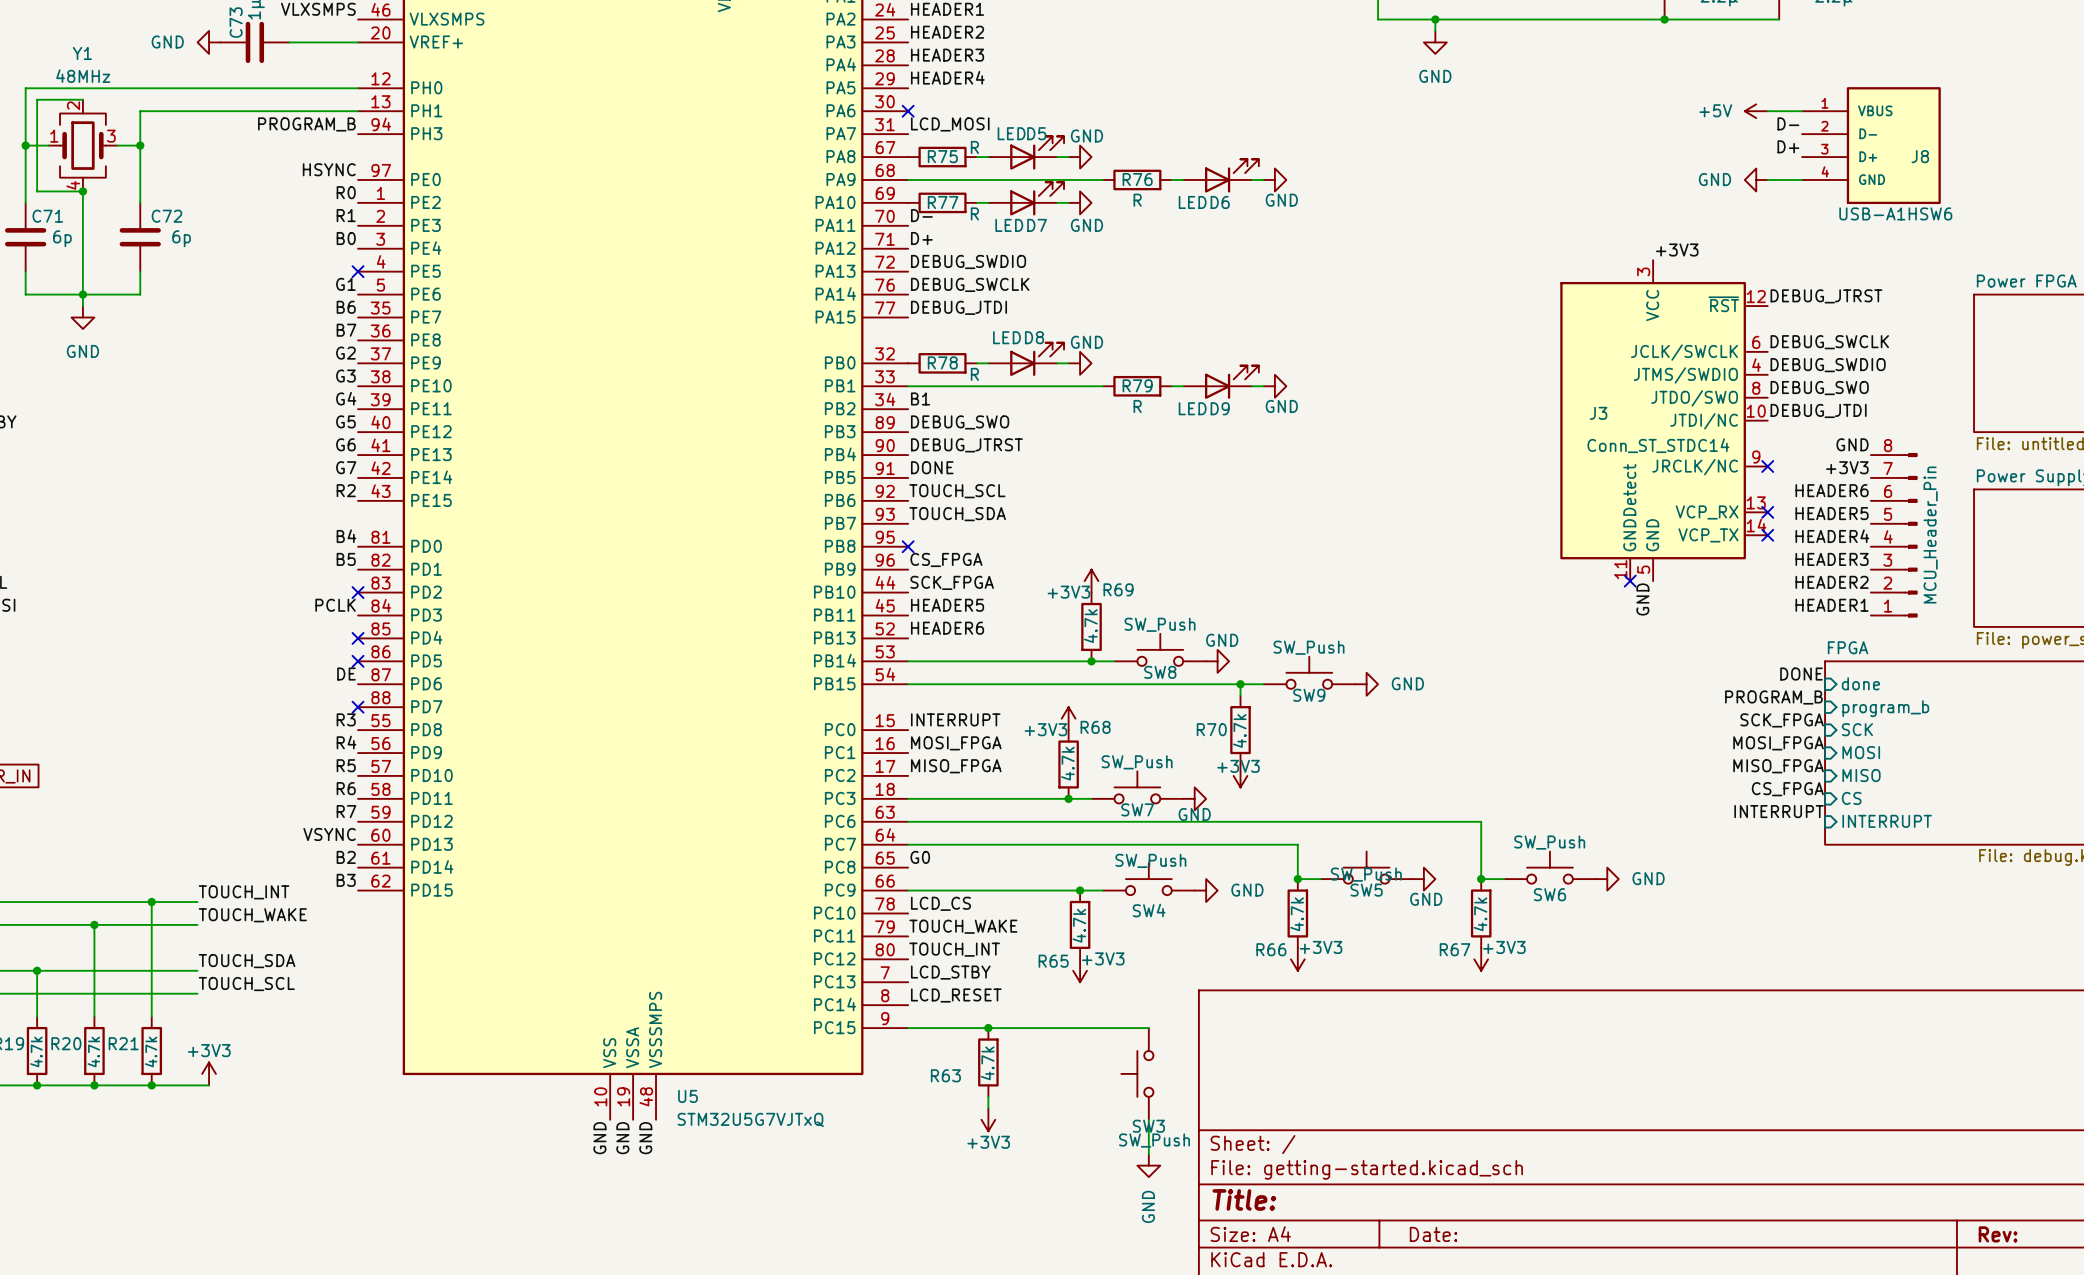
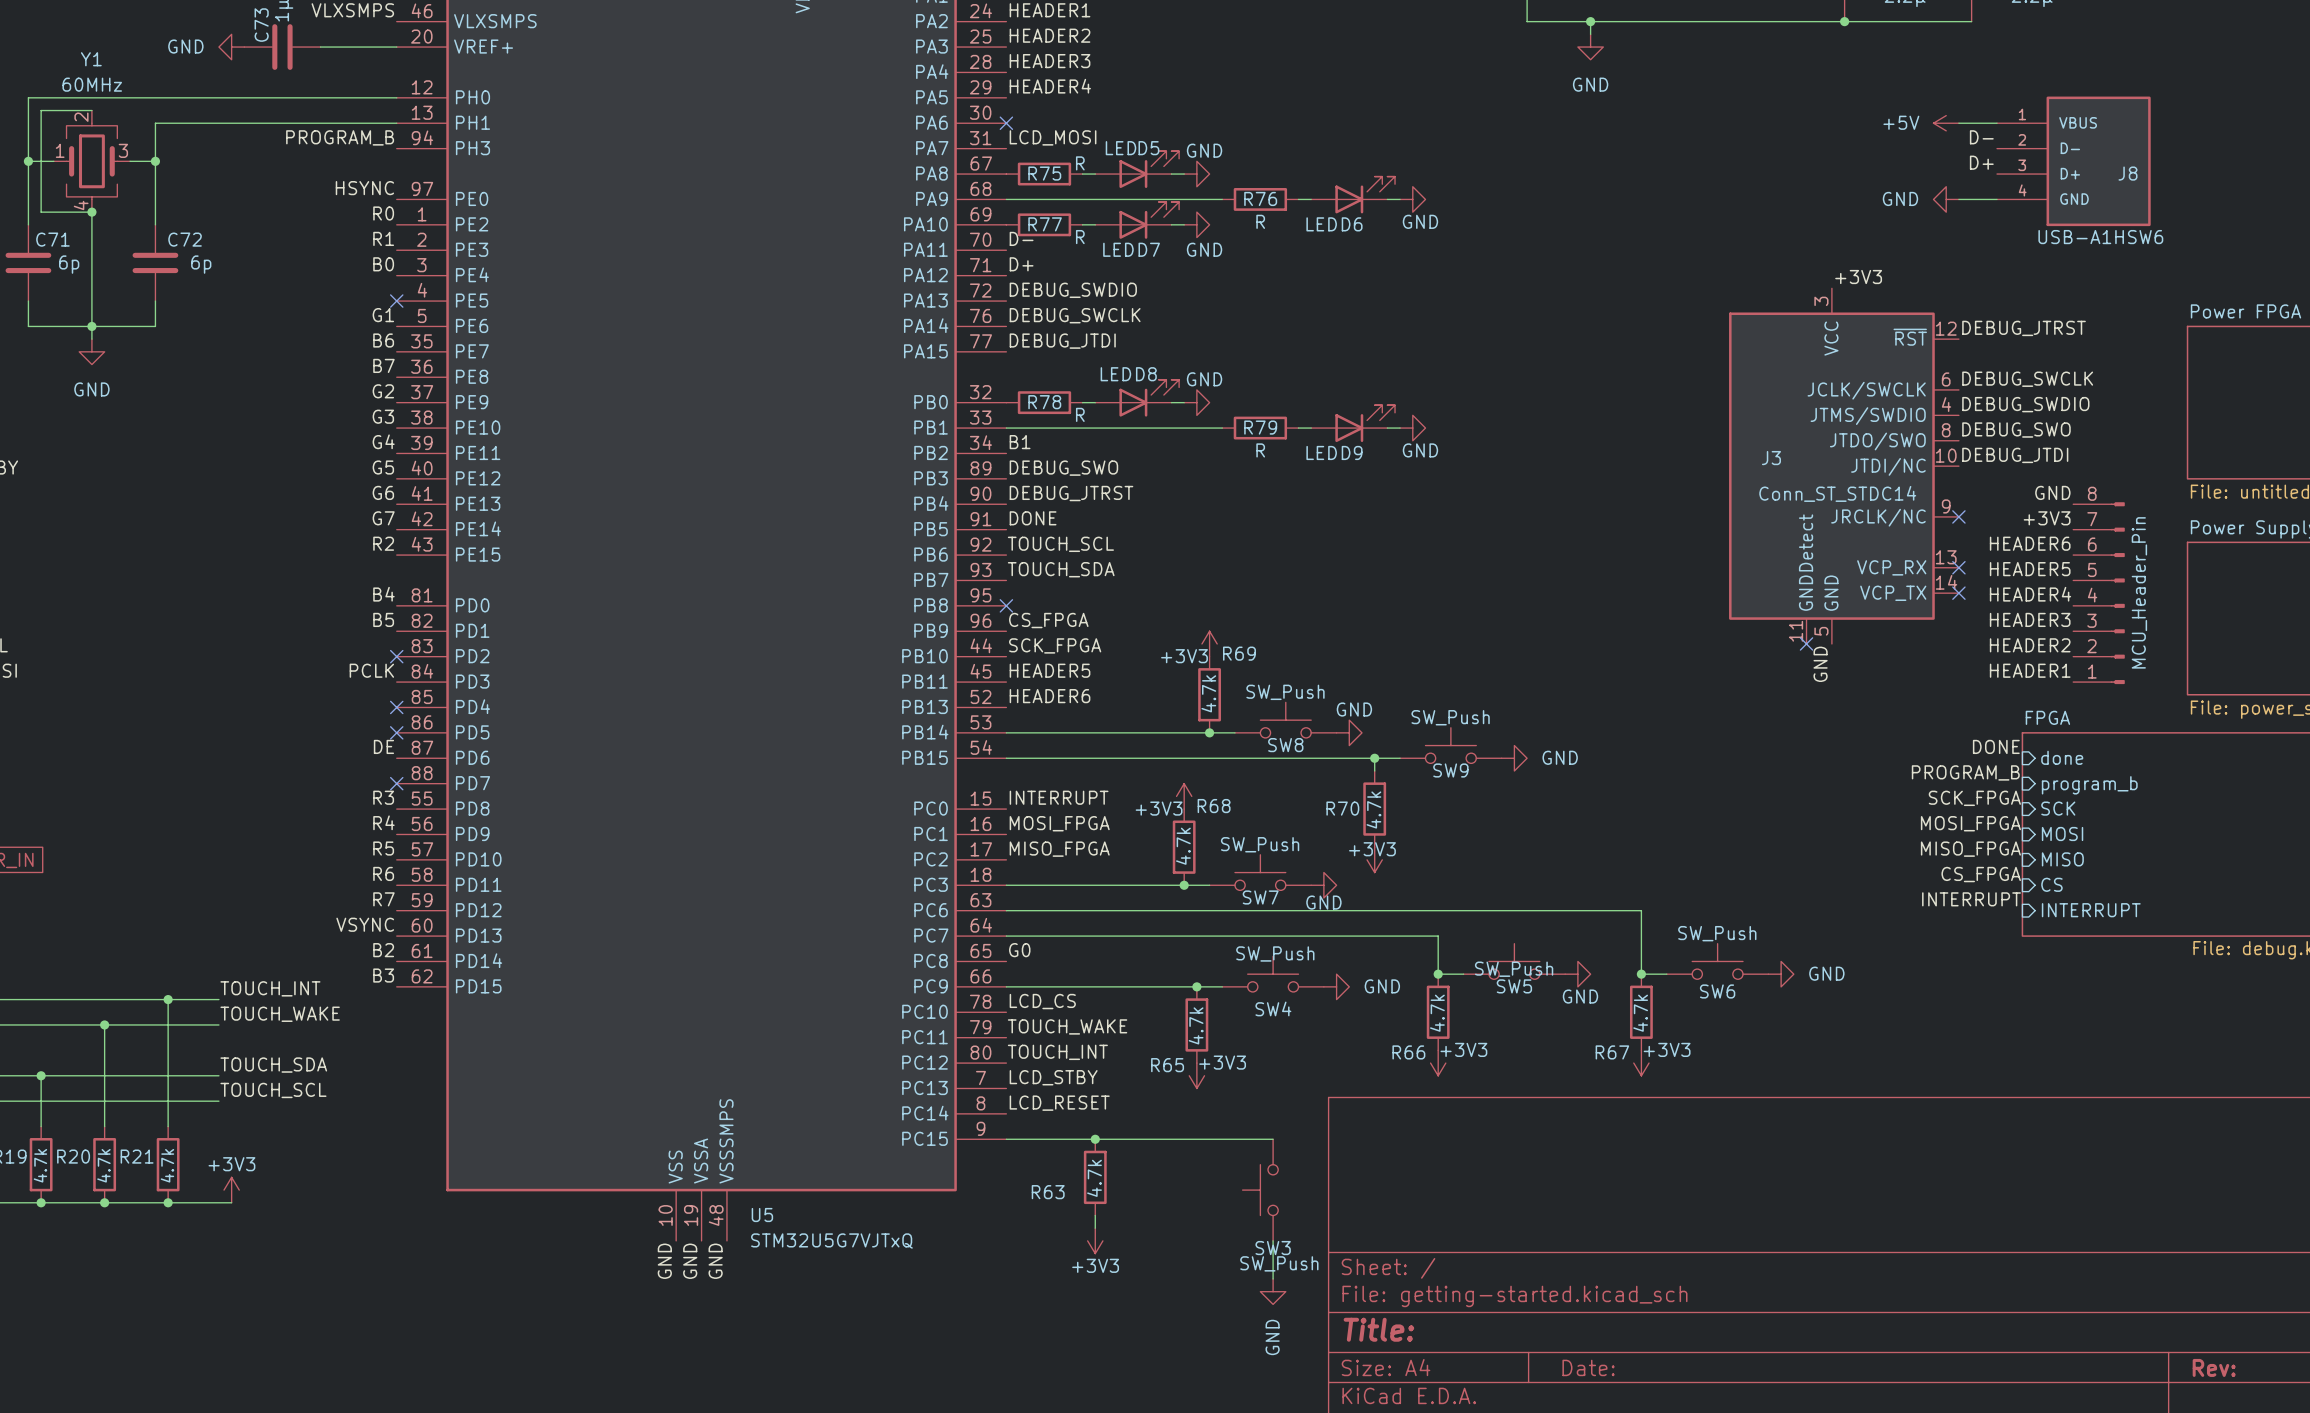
Y1 value: 48MHz (83, 76) -> 60MHz (92, 84)

